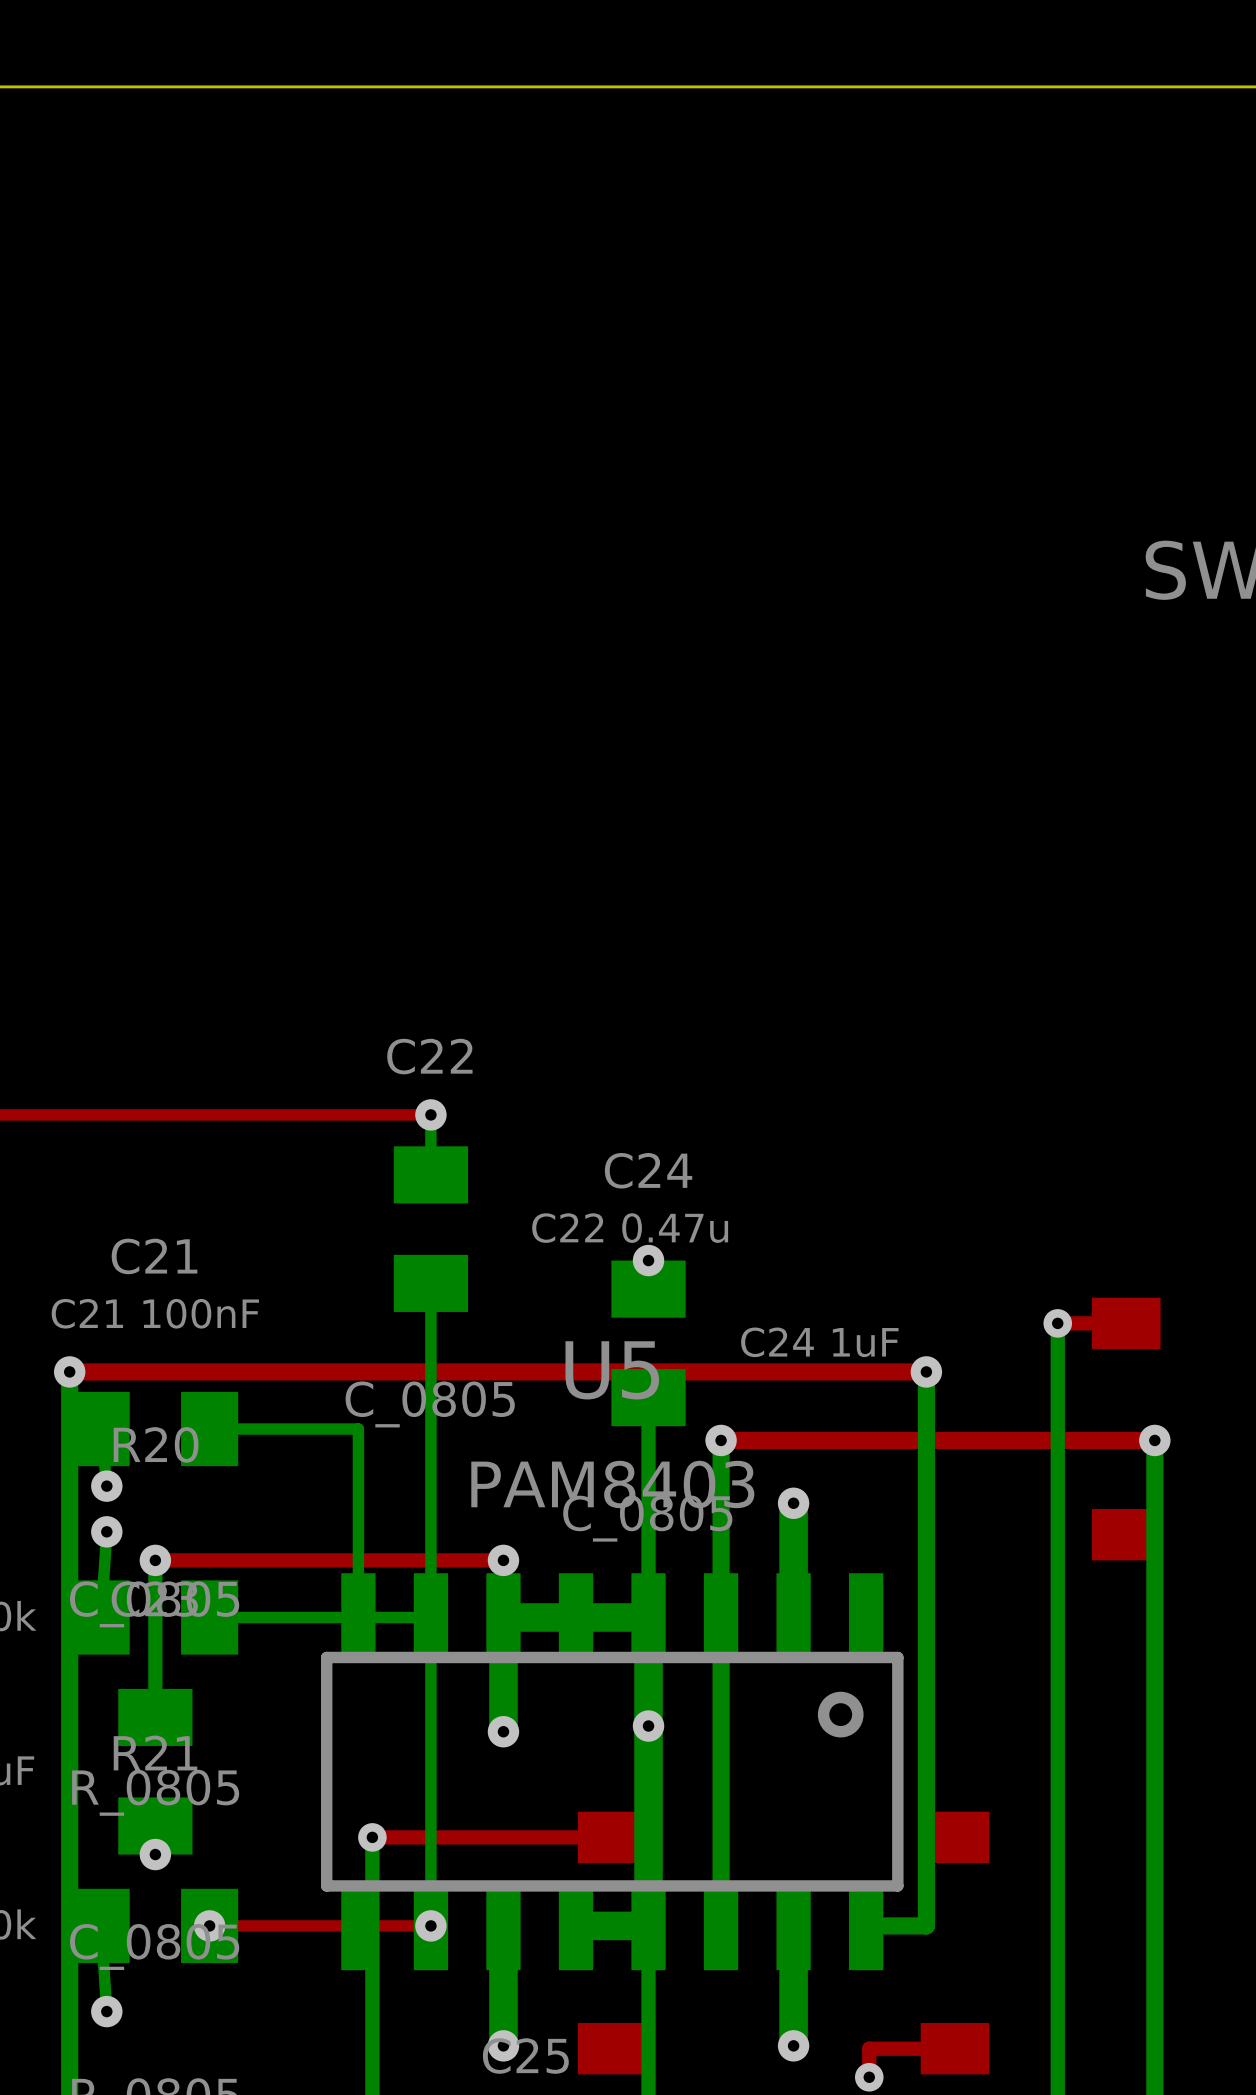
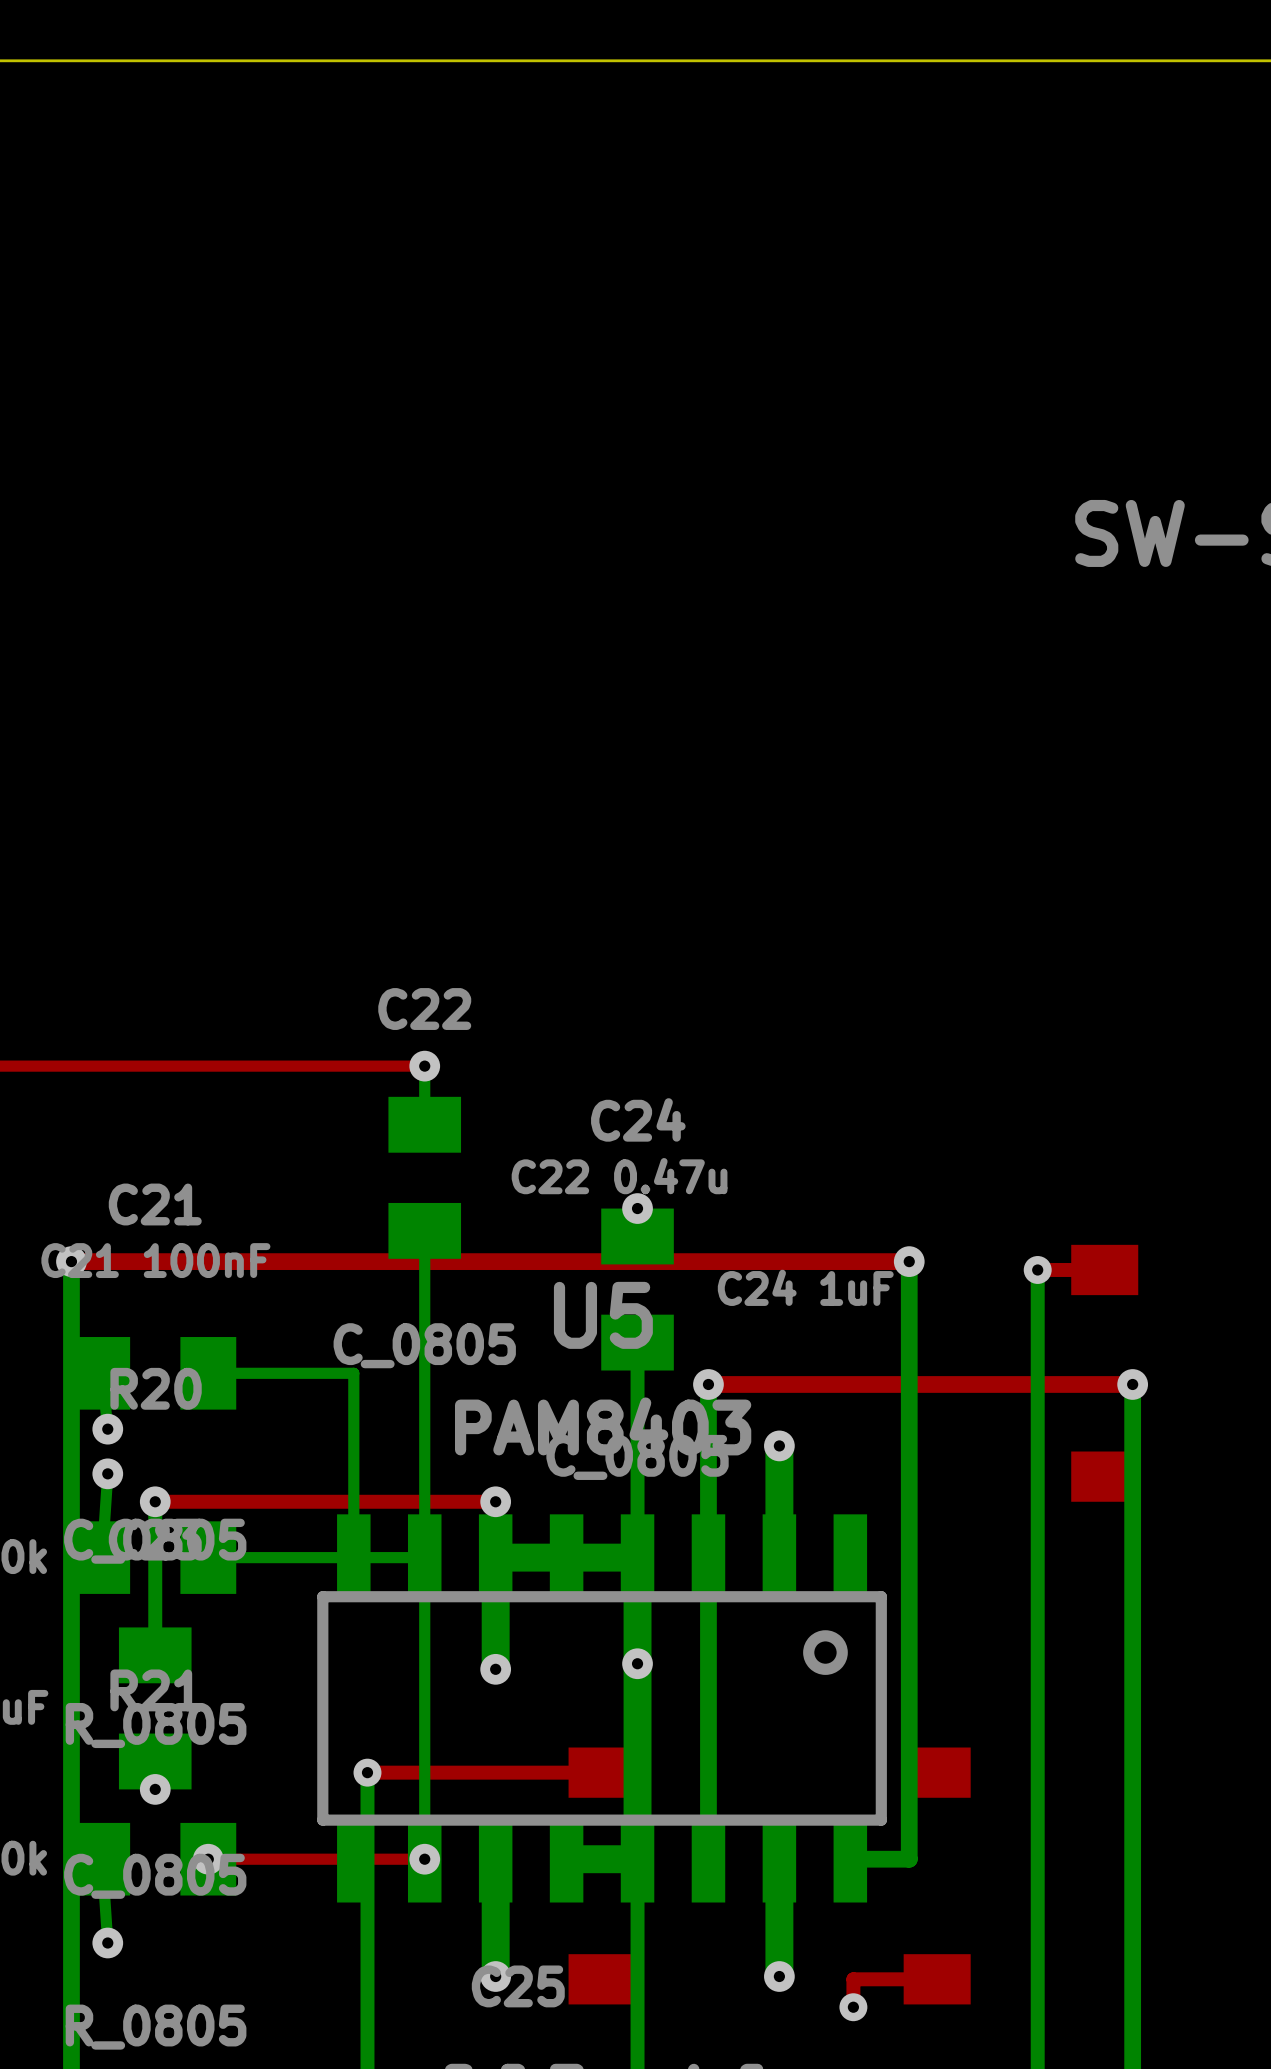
bottom track: none -> (71, 1261) (71, 1317)
bottom track: none -> (909, 1261) (909, 1317)
via position: (69, 1371) -> (71, 1261)
top track: (926, 1371) (69, 1371) -> (909, 1261) (71, 1261)
via position: (926, 1371) -> (909, 1261)

